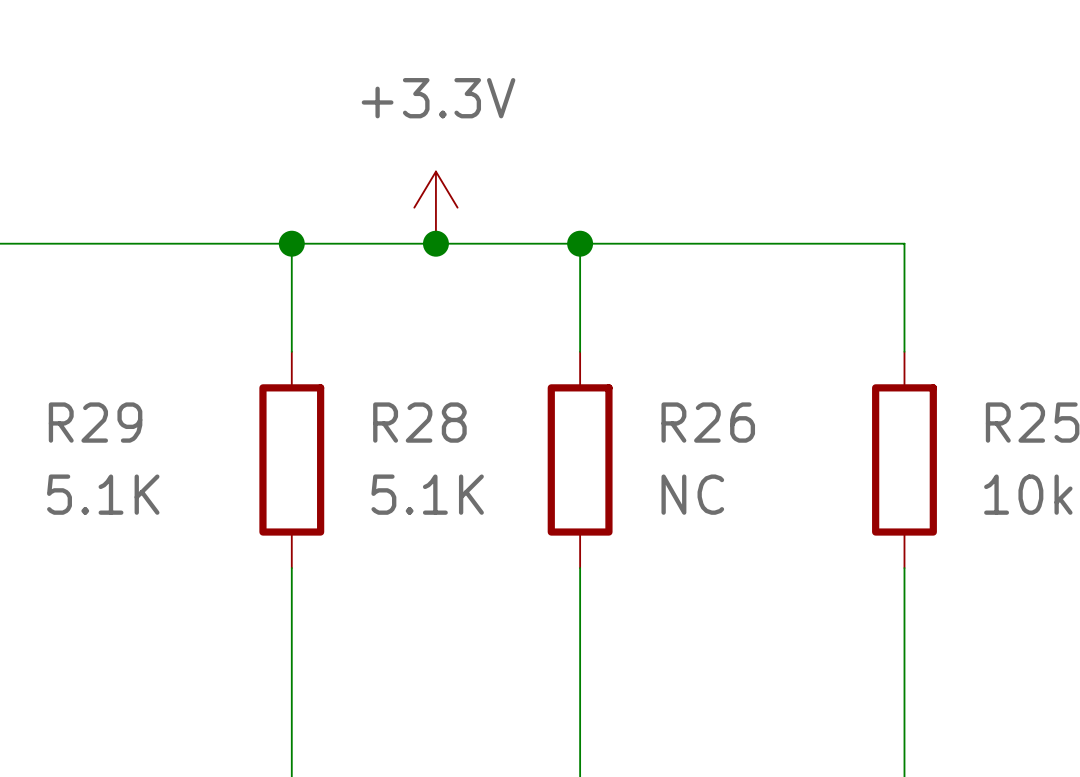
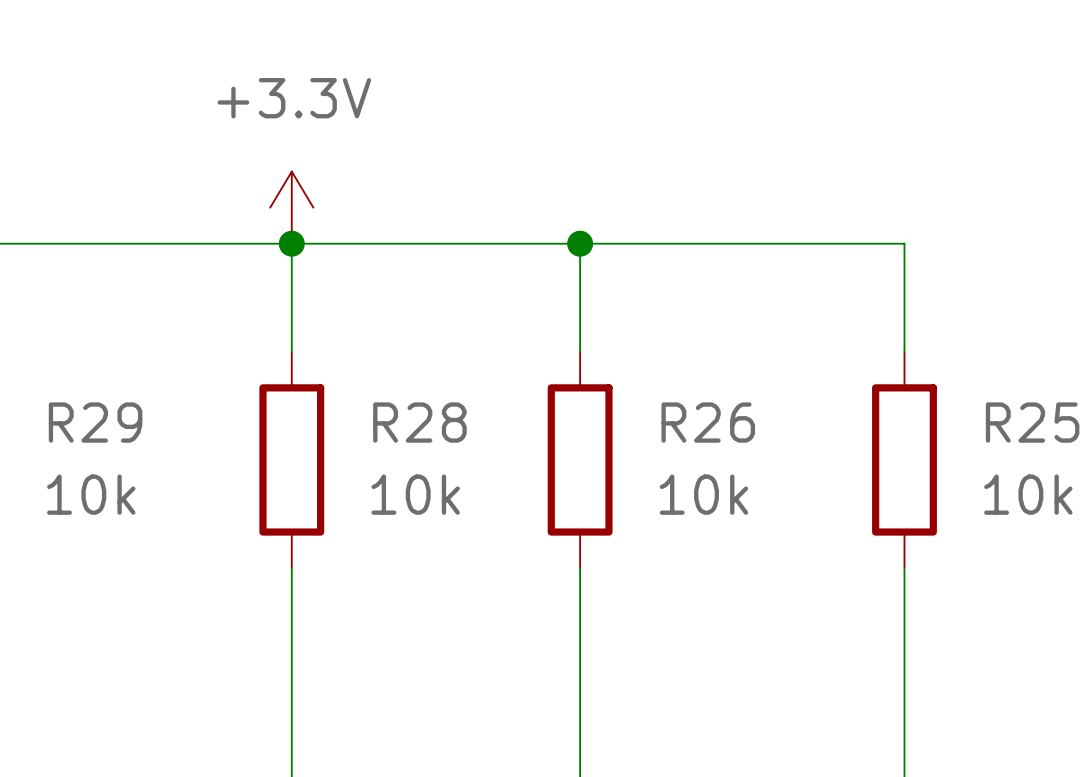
power symbol position: +3.3V (435, 207) -> +3.3V (291, 207)
junction: (435, 243) -> none
R29 value: 5.1K (103, 494) -> 10k (91, 494)
R28 value: 5.1K (427, 494) -> 10k (415, 494)
R26 value: NC (692, 494) -> 10k (703, 494)

